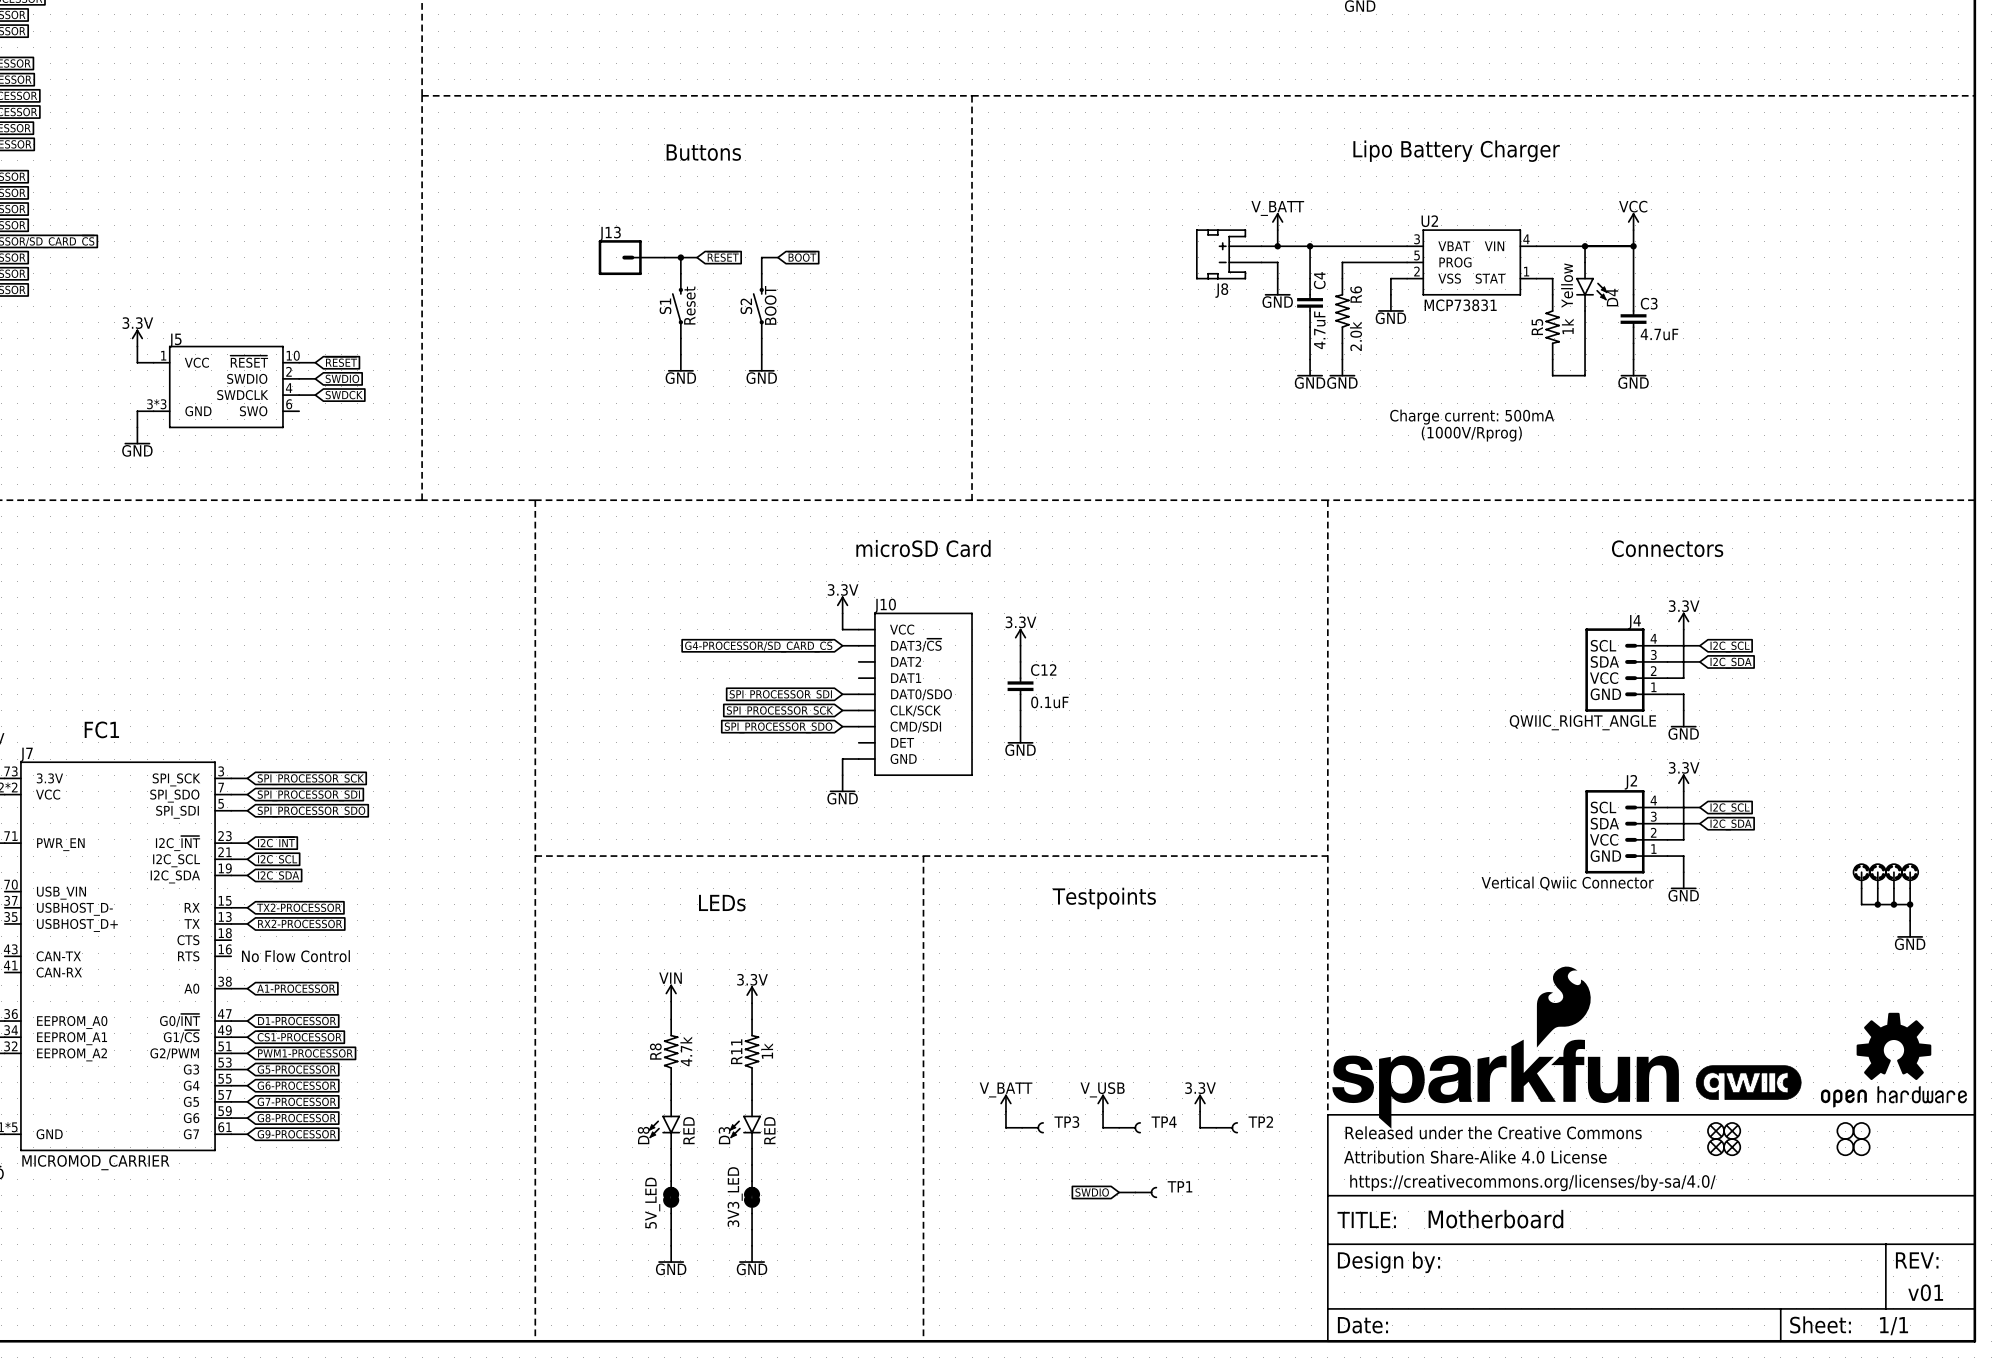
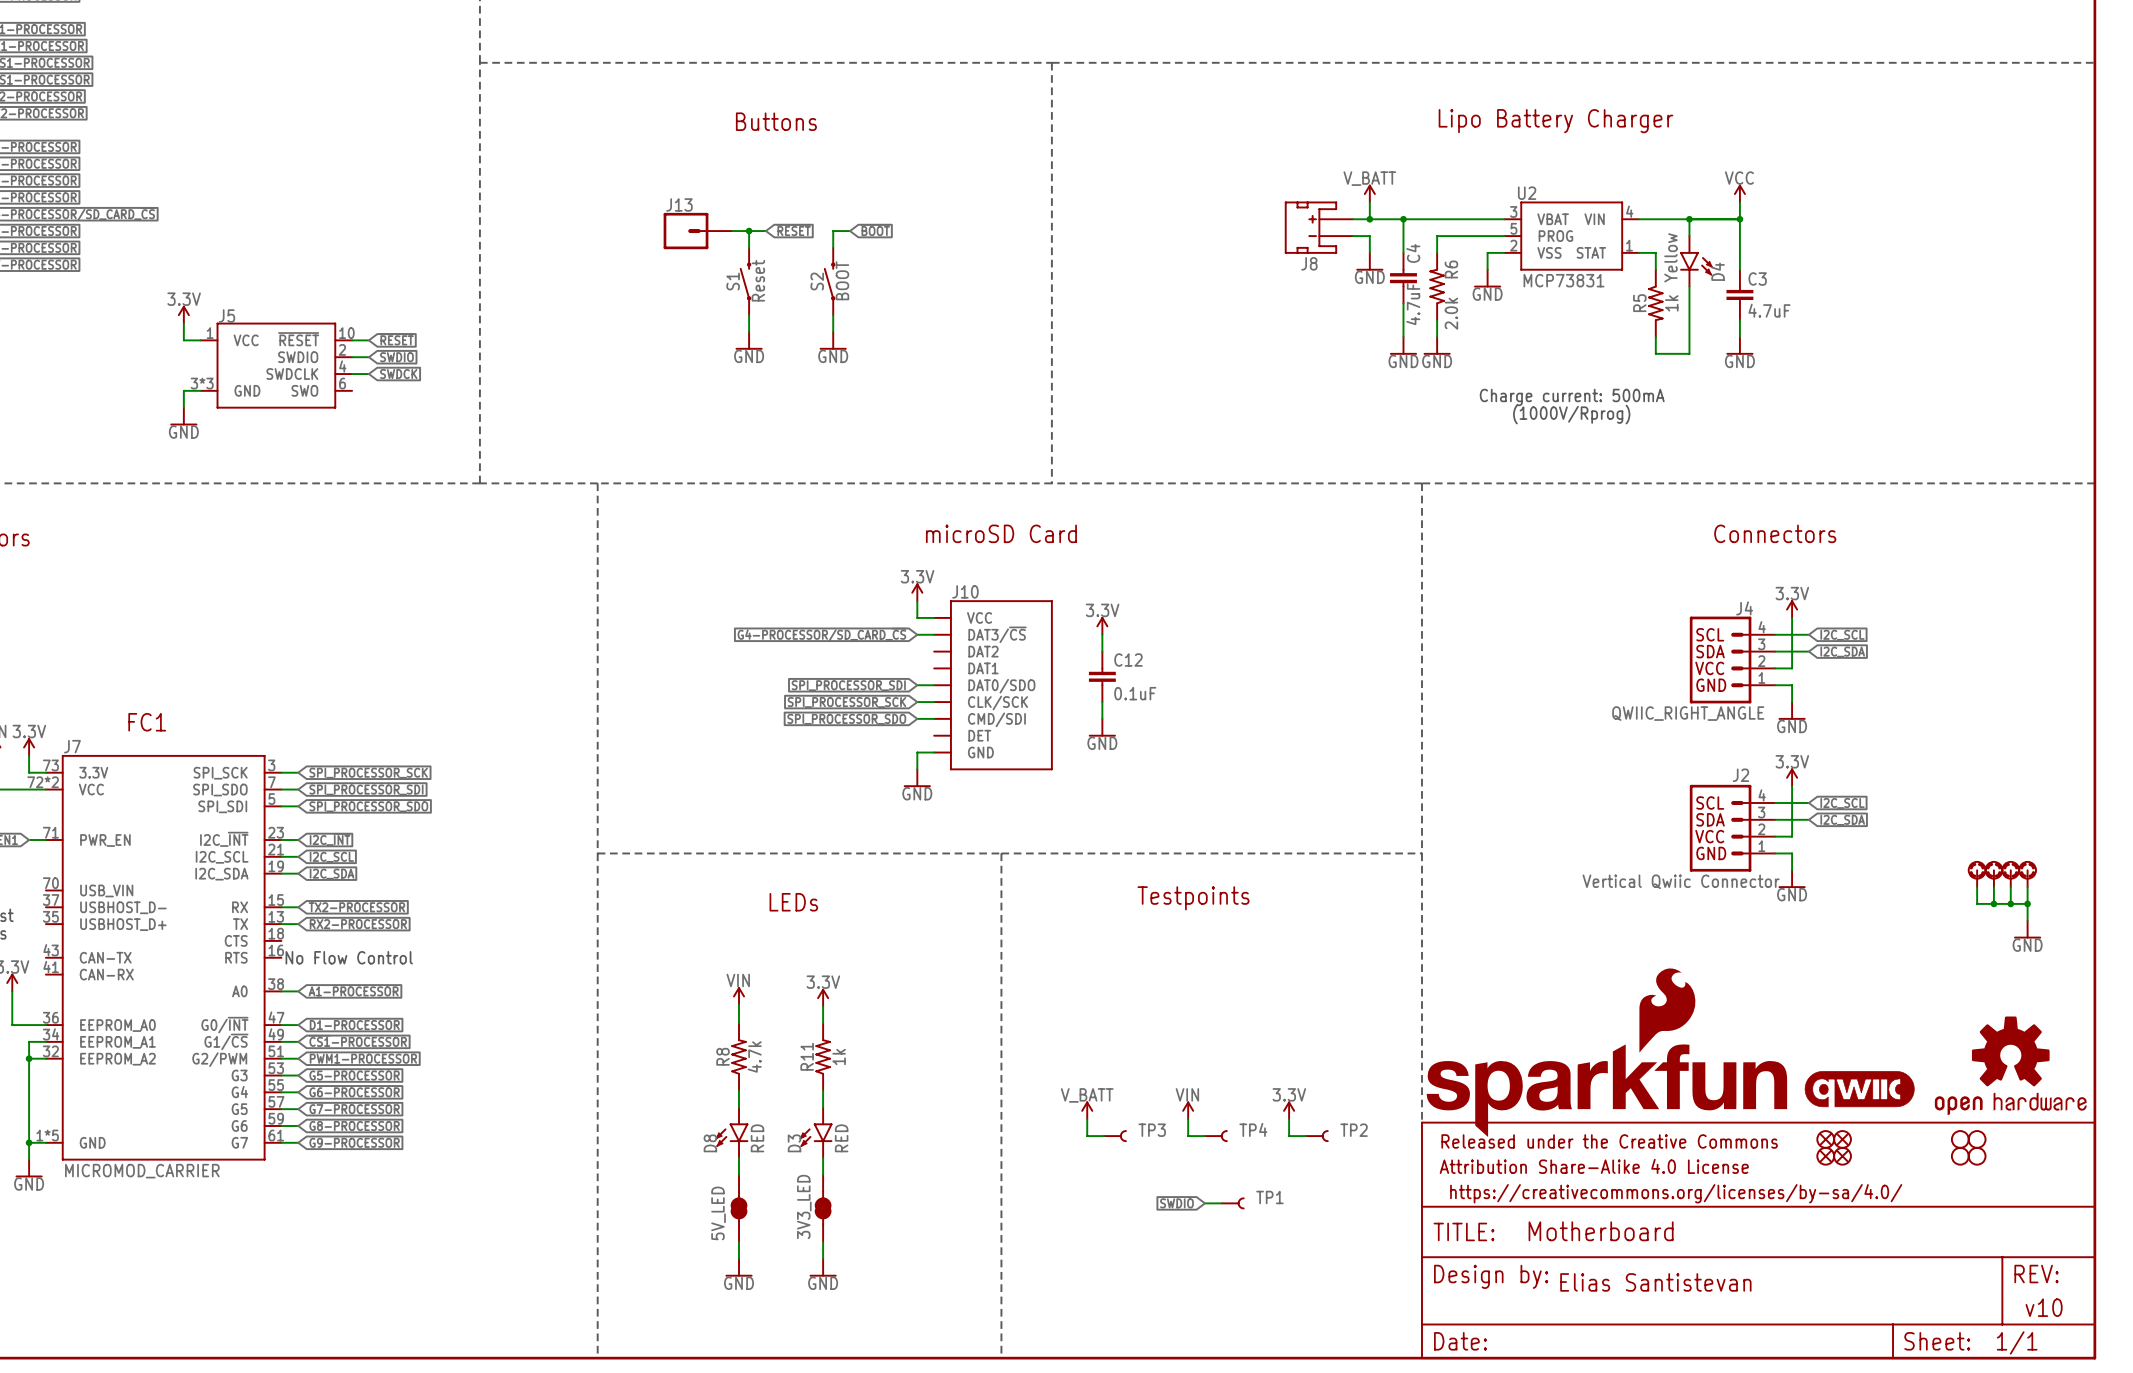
power symbol: V_USB (1103, 1103) -> VIN (1188, 1110)
text: none -> Elias Santistevan (1655, 1282)
text: v01 (1925, 1292) -> v10 (2044, 1307)

